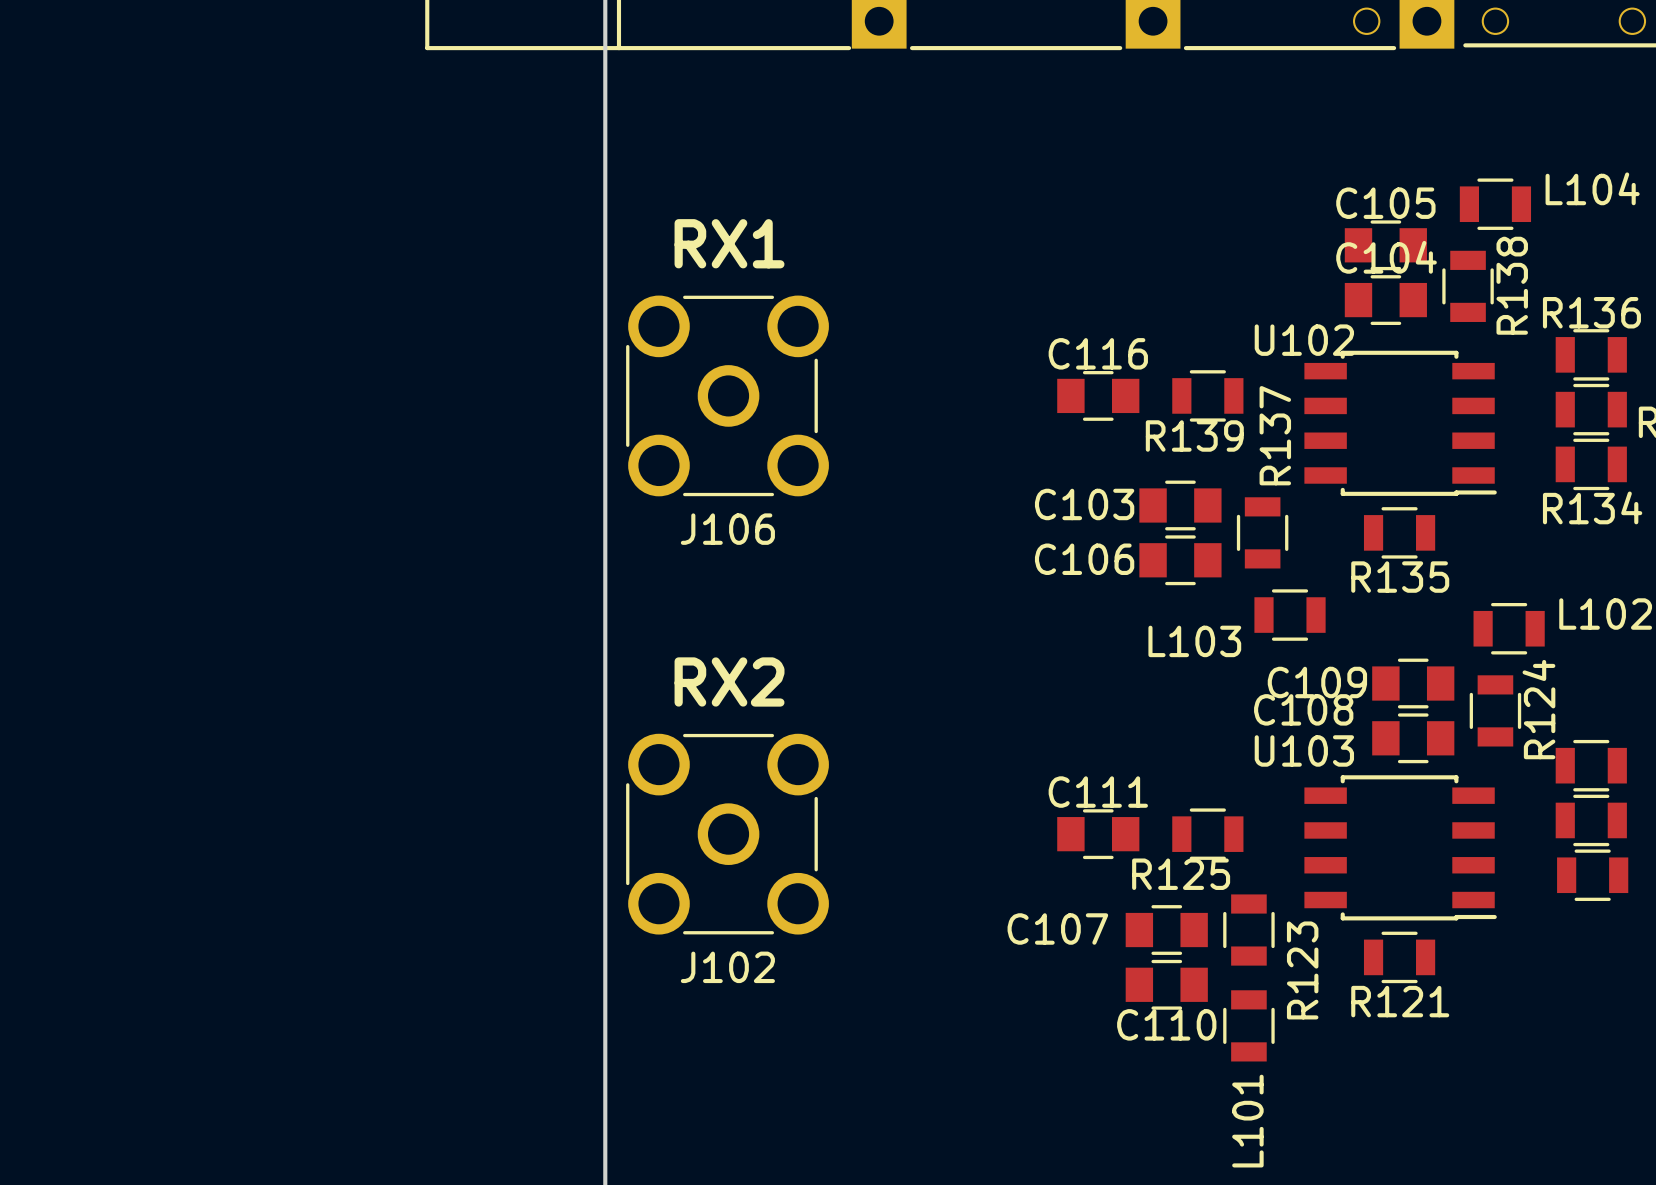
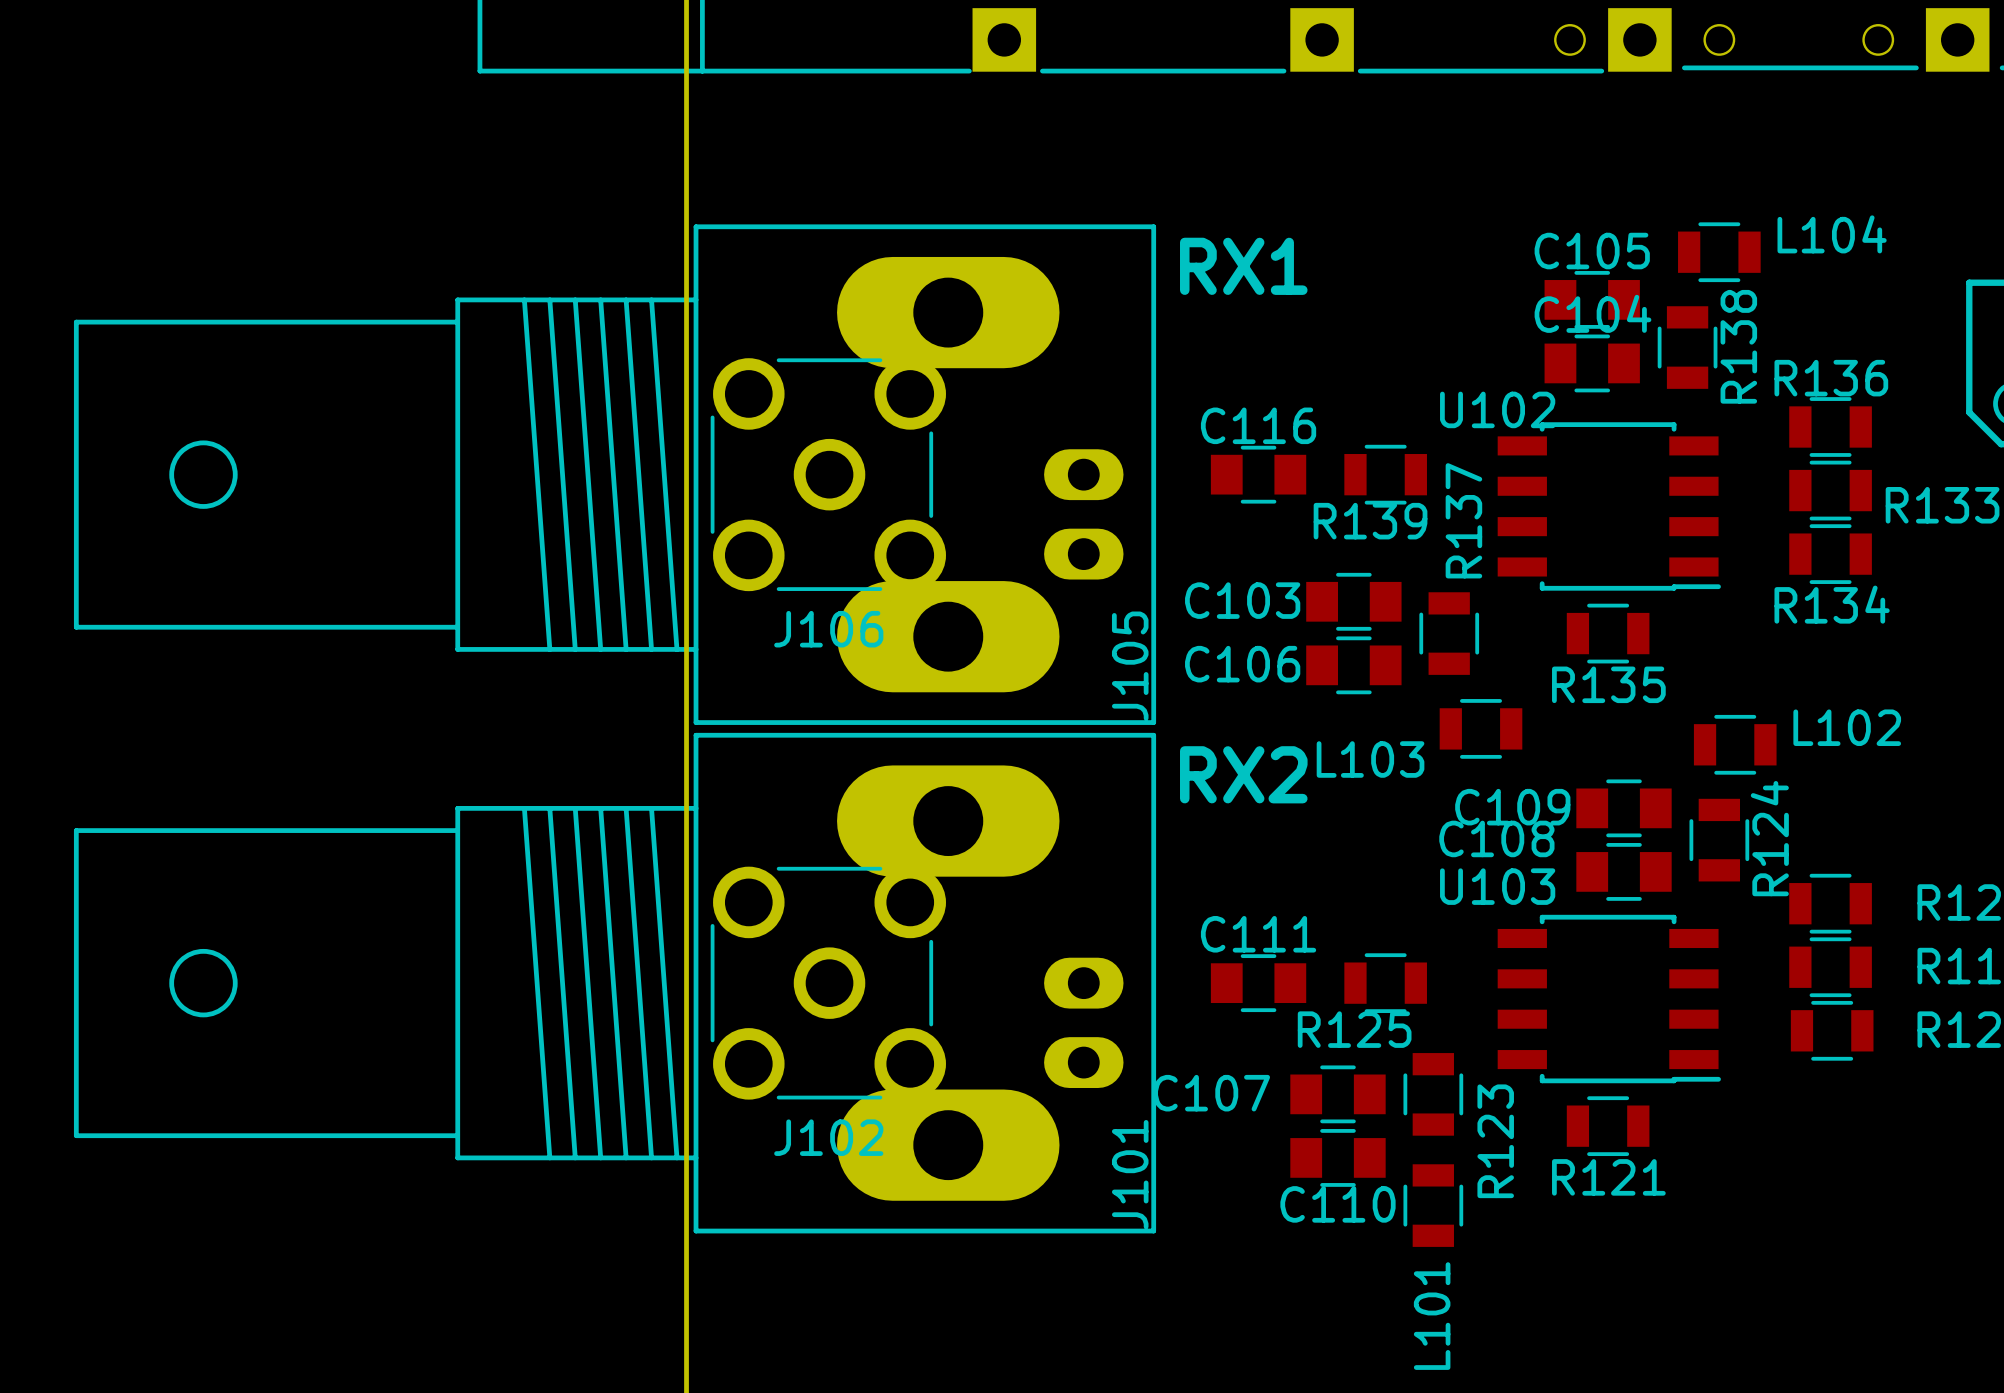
text position: RX1 (729, 243) -> RX1 (1243, 266)
J105: none -> (615, 474)
text position: RX2 (729, 681) -> RX2 (1243, 774)
J101: none -> (615, 983)

